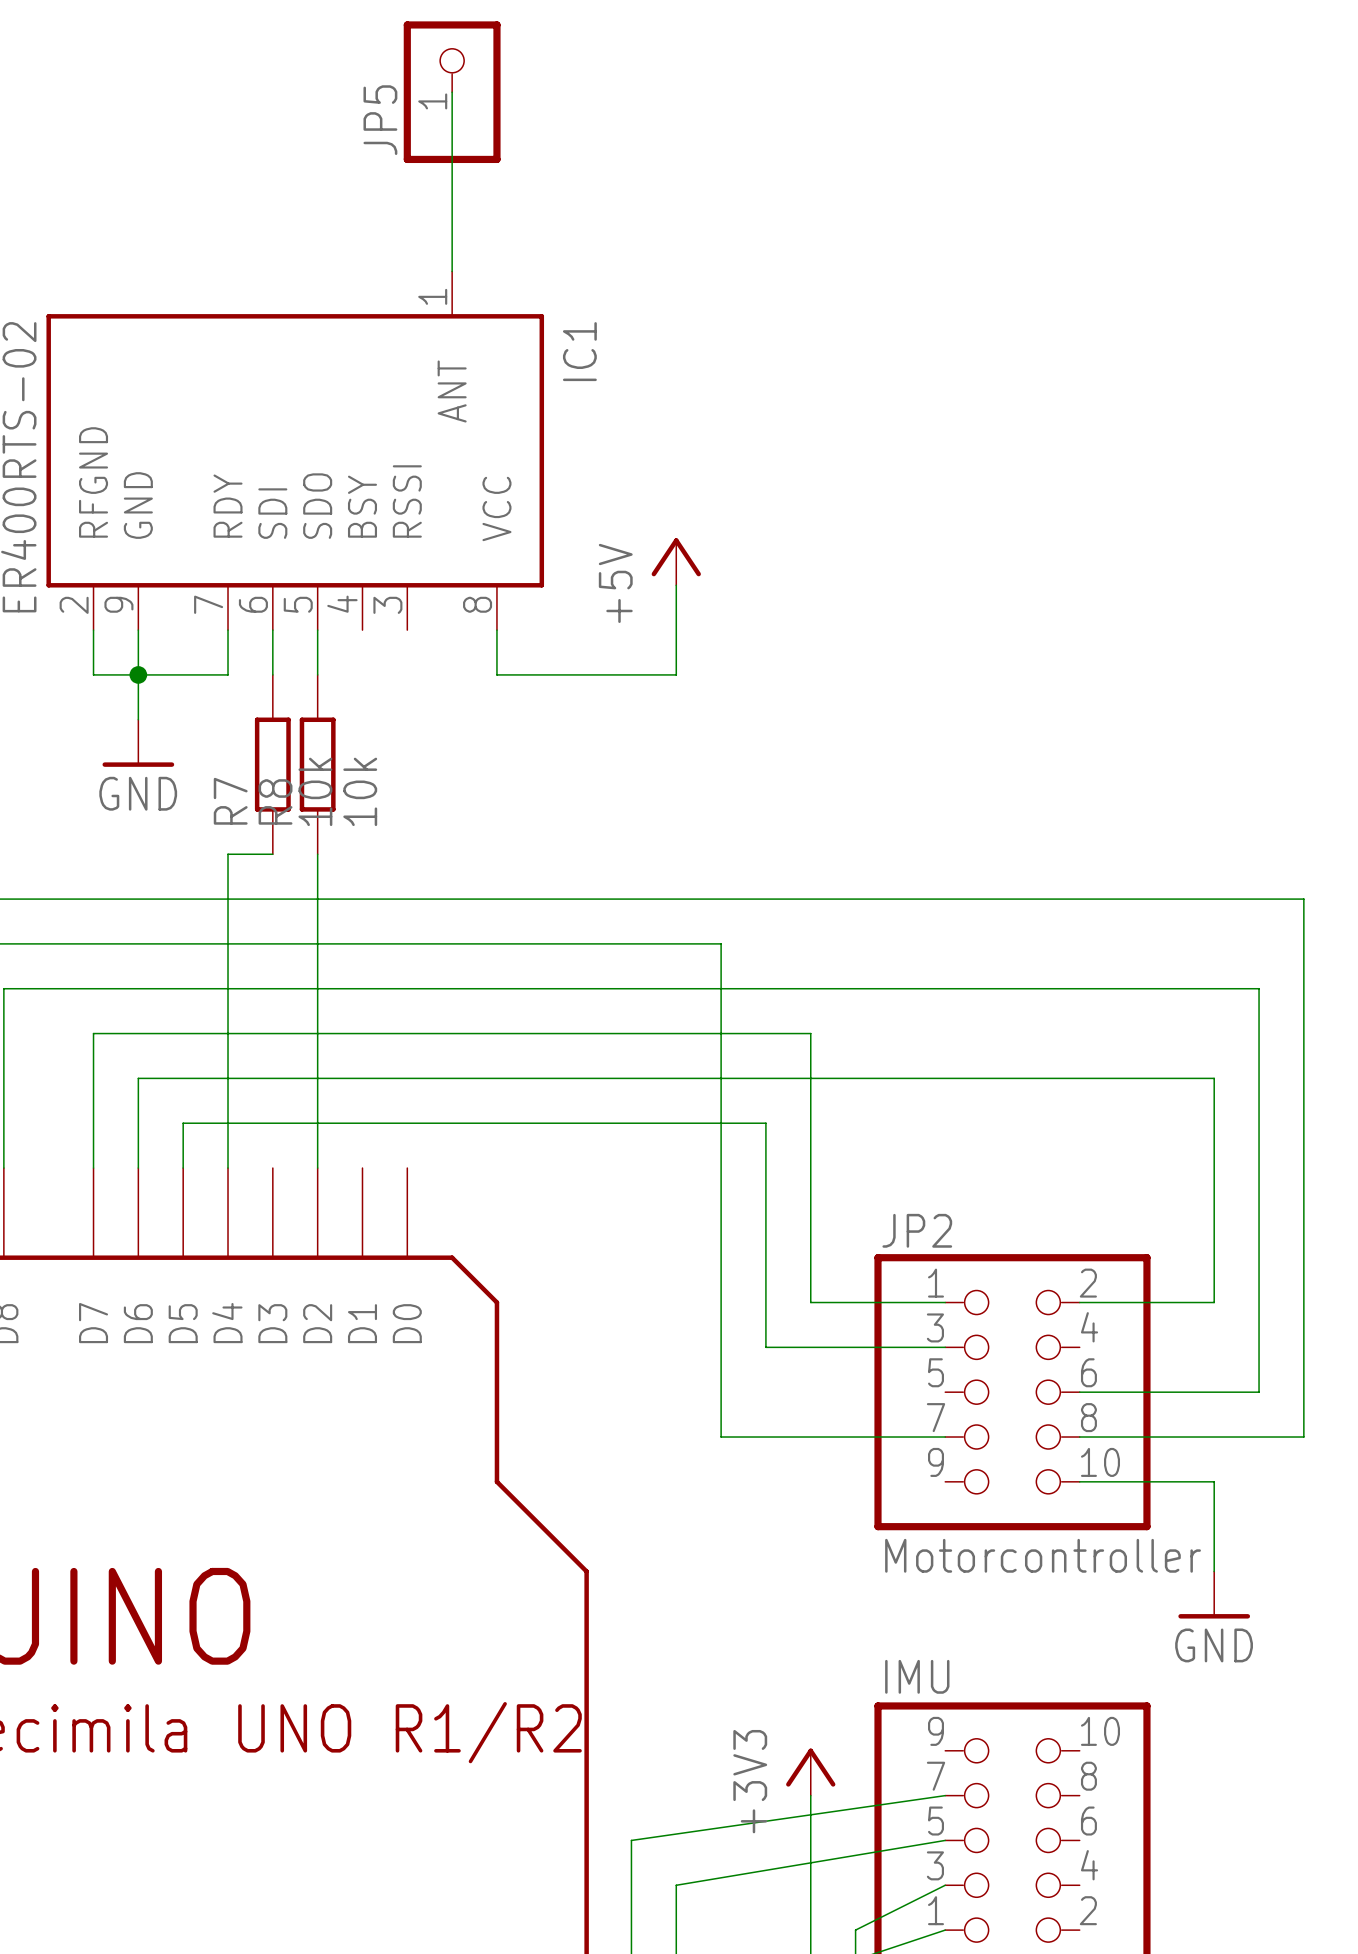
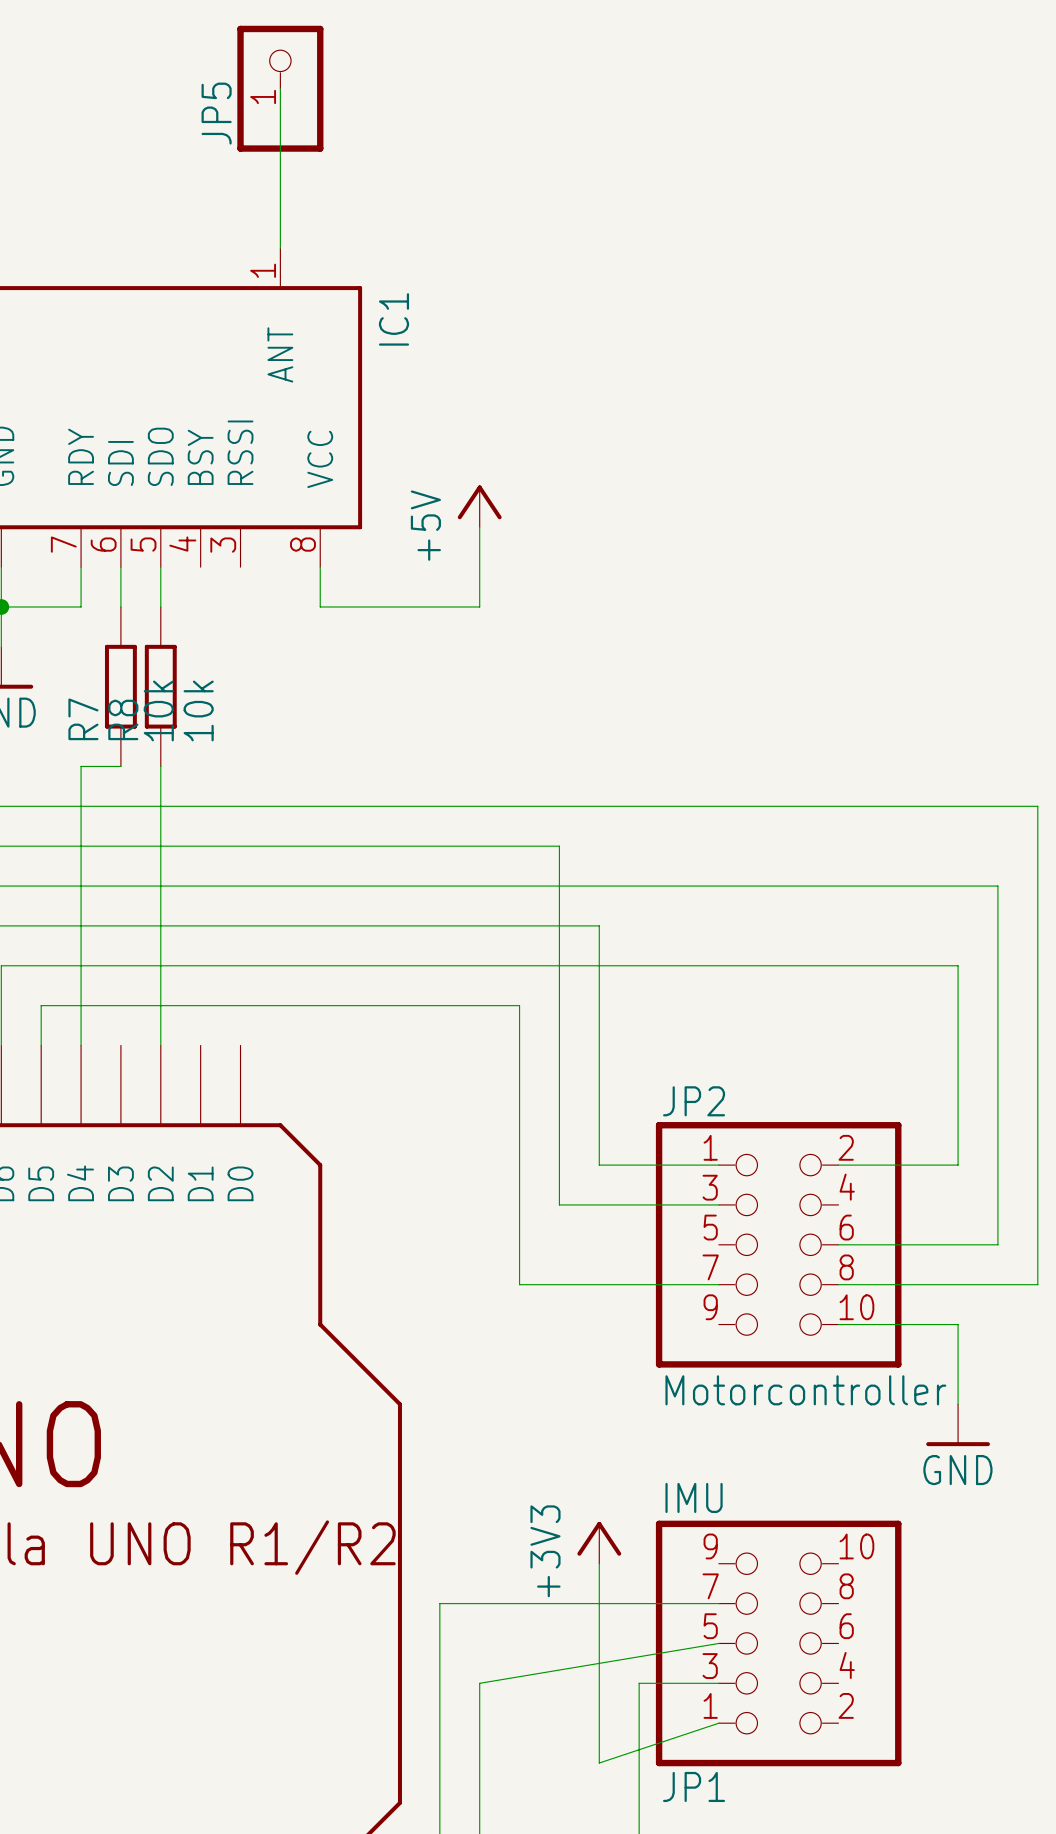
wire: (721, 943) (721, 1123) (765, 1123) -> (519, 846) (559, 846) (559, 1005)
power symbol position: +3V3 (810, 1772) -> +3V3 (599, 1542)
wire: (945, 1795) (631, 1840) -> (718, 1603) (439, 1603) (439, 1643)
wire: (945, 1885) (855, 1930) -> (718, 1683) (639, 1683) (639, 1723)

